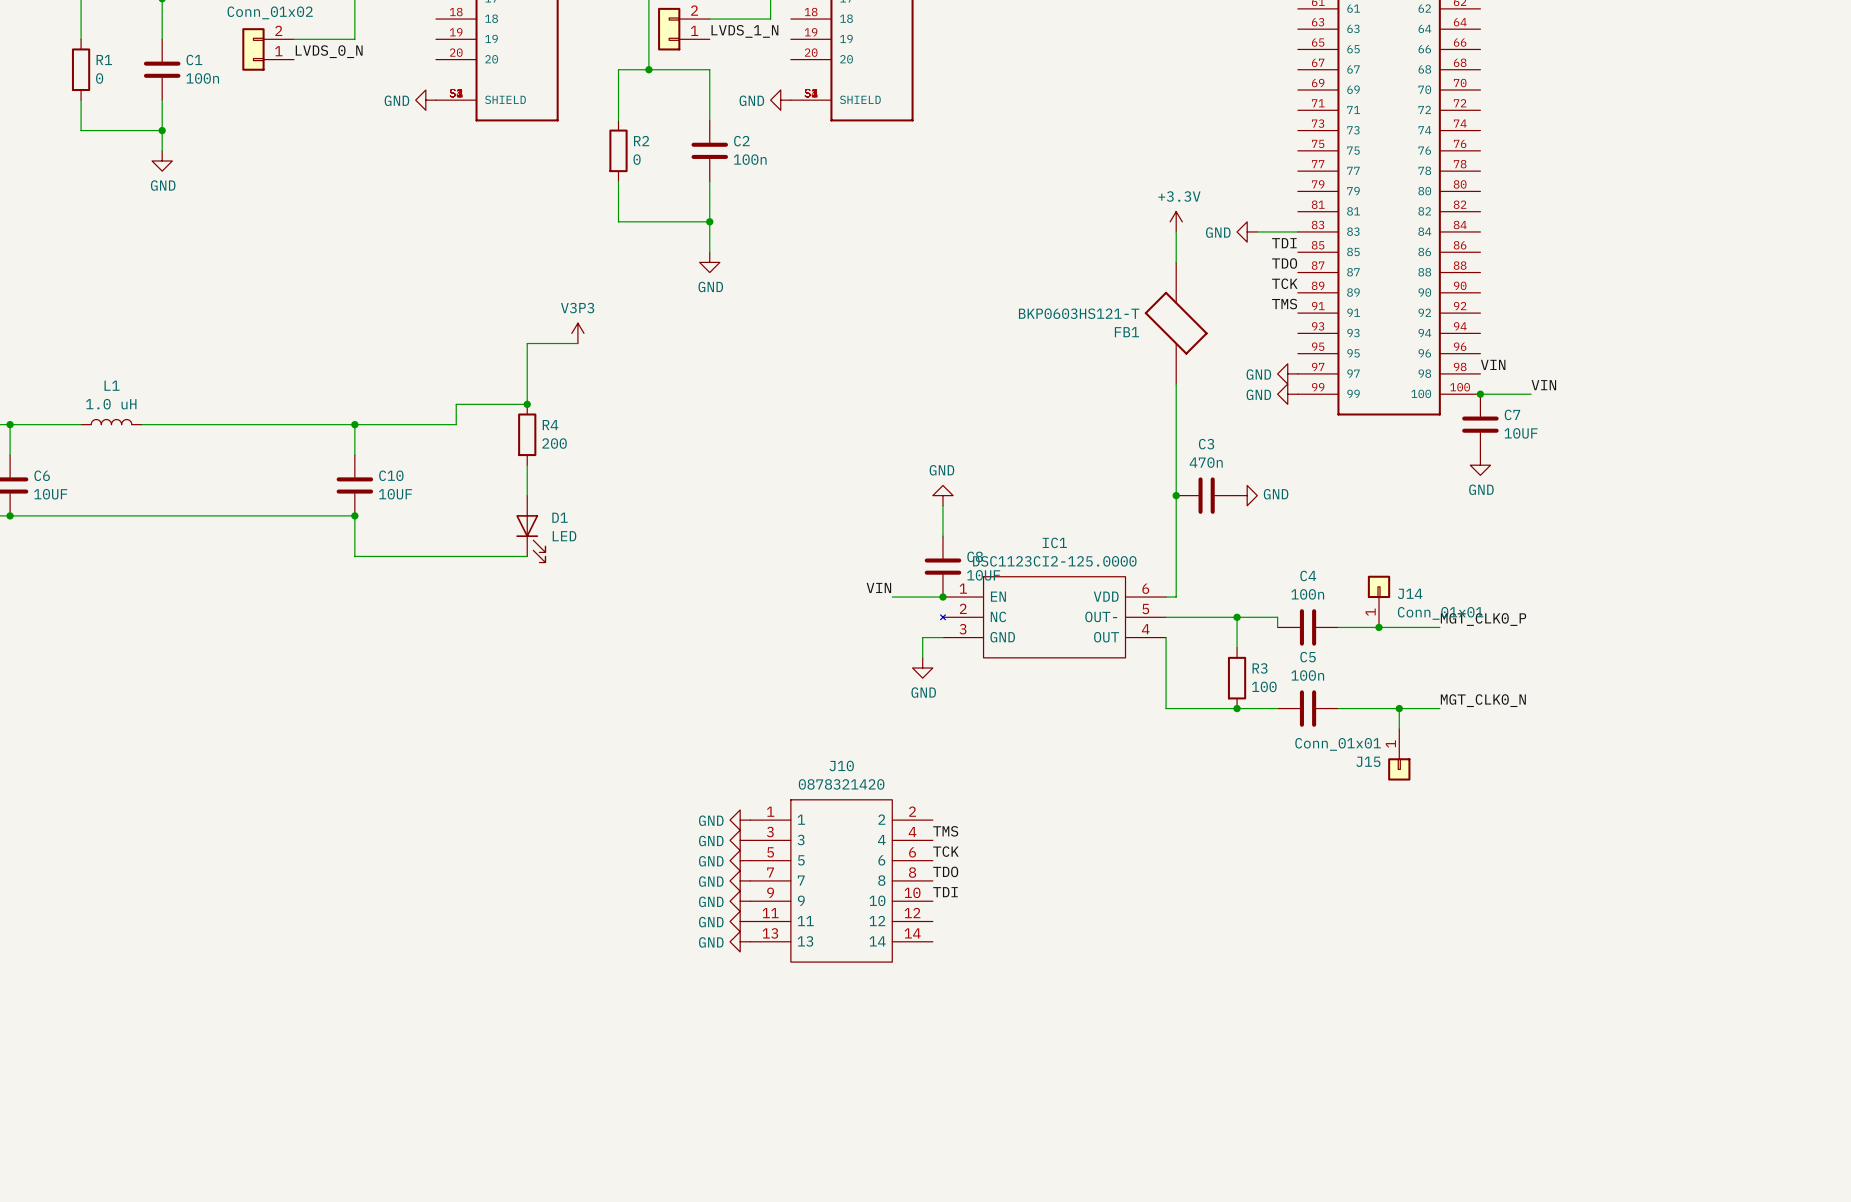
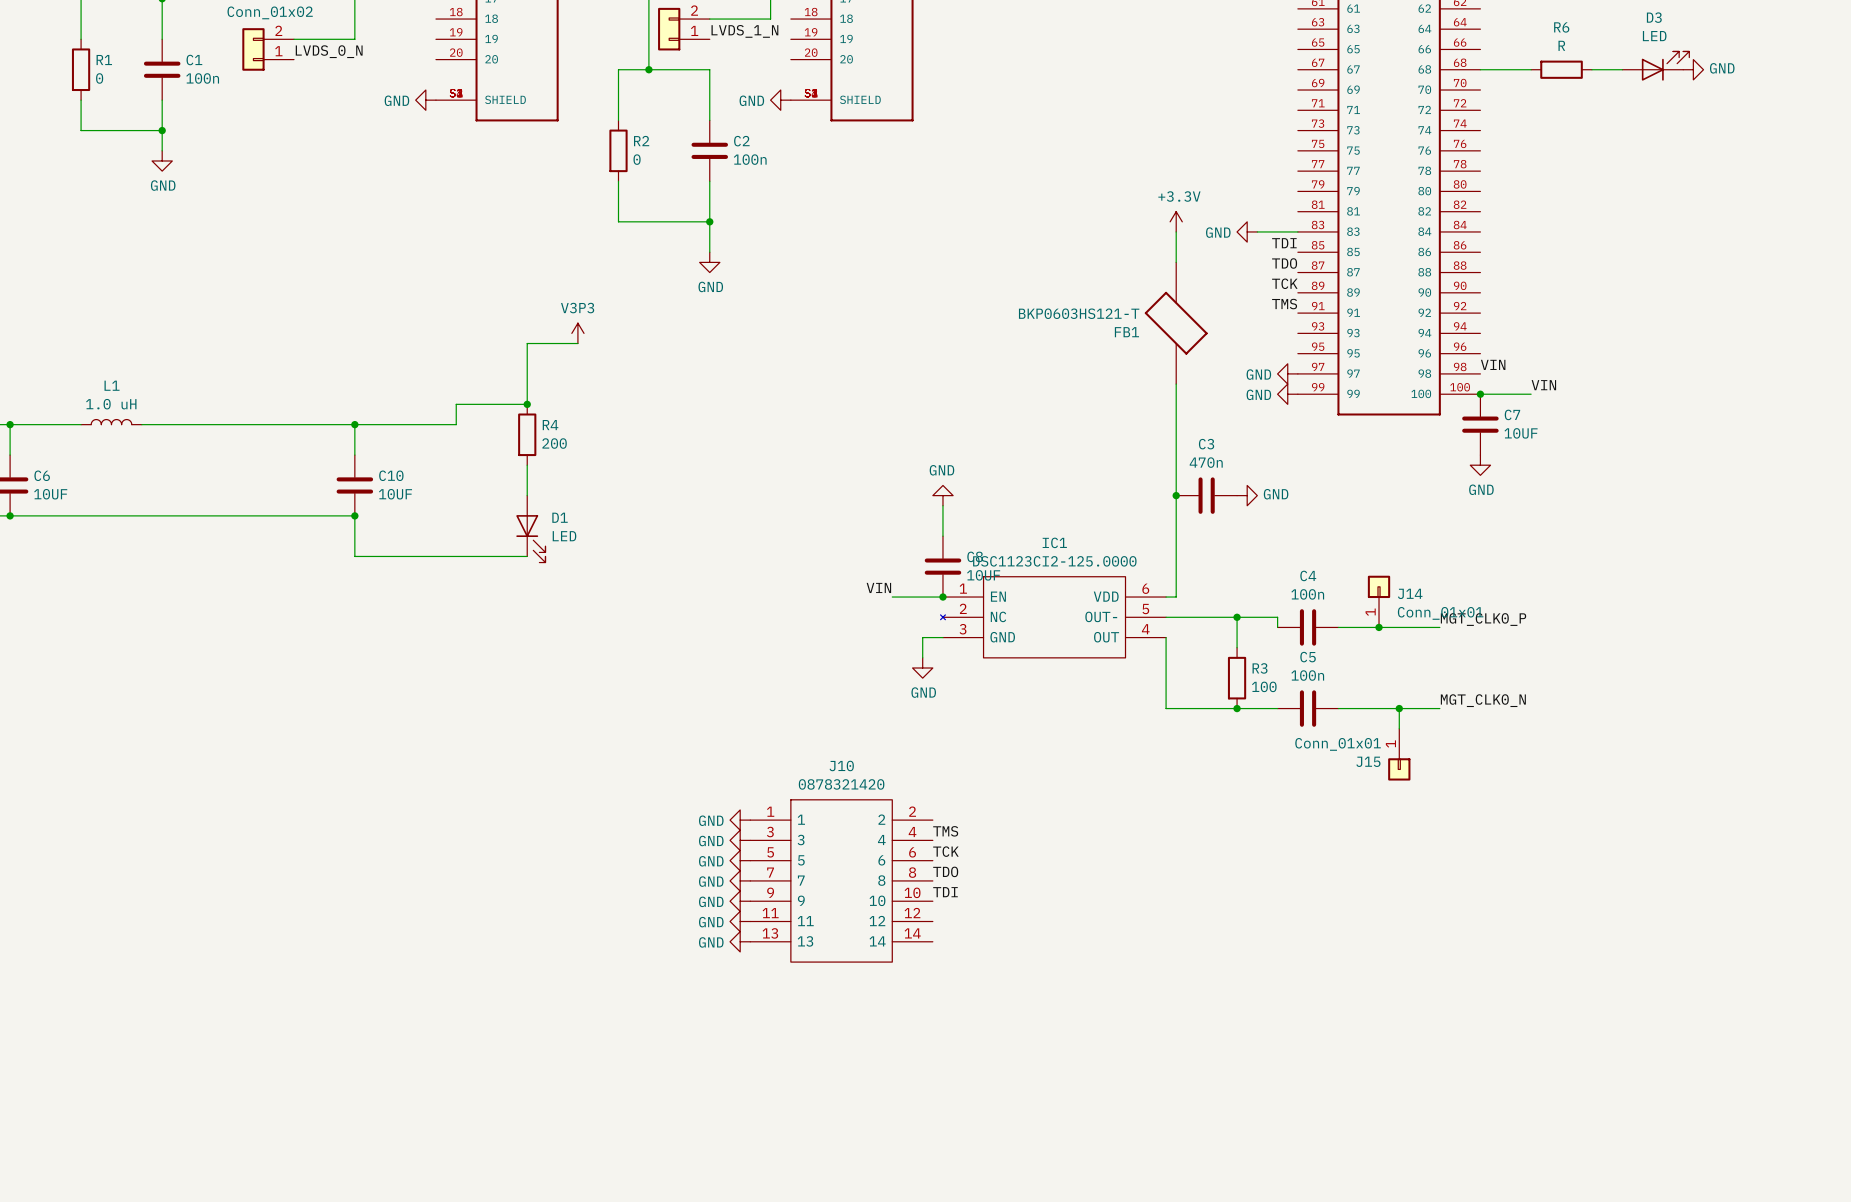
D3: none -> LED (1655, 66)
wire: none -> (1480, 69) (1531, 69)
R6: none -> R (1561, 69)
wire: none -> (1591, 69) (1622, 69)
power symbol: none -> GND (1693, 69)

